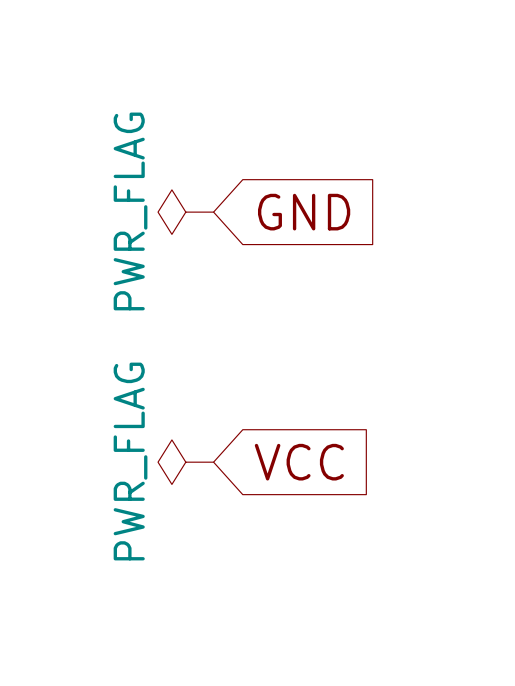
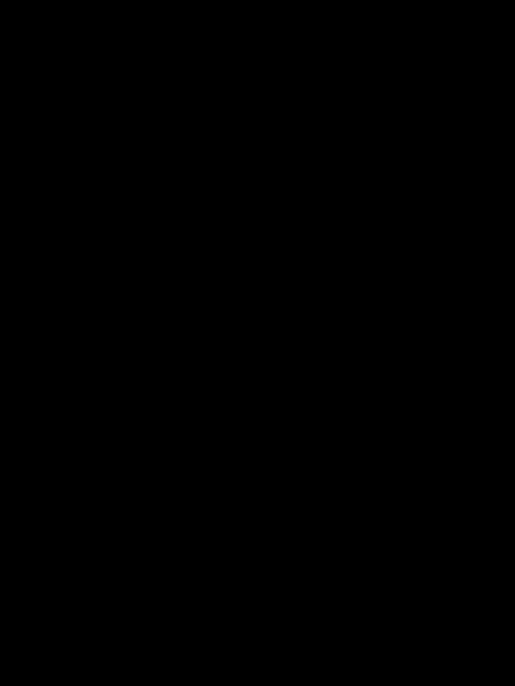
power symbol: PWR_FLAG (185, 212) -> none
global label: GND (304, 212) -> none
power symbol: PWR_FLAG (185, 462) -> none
global label: VCC (299, 462) -> none

